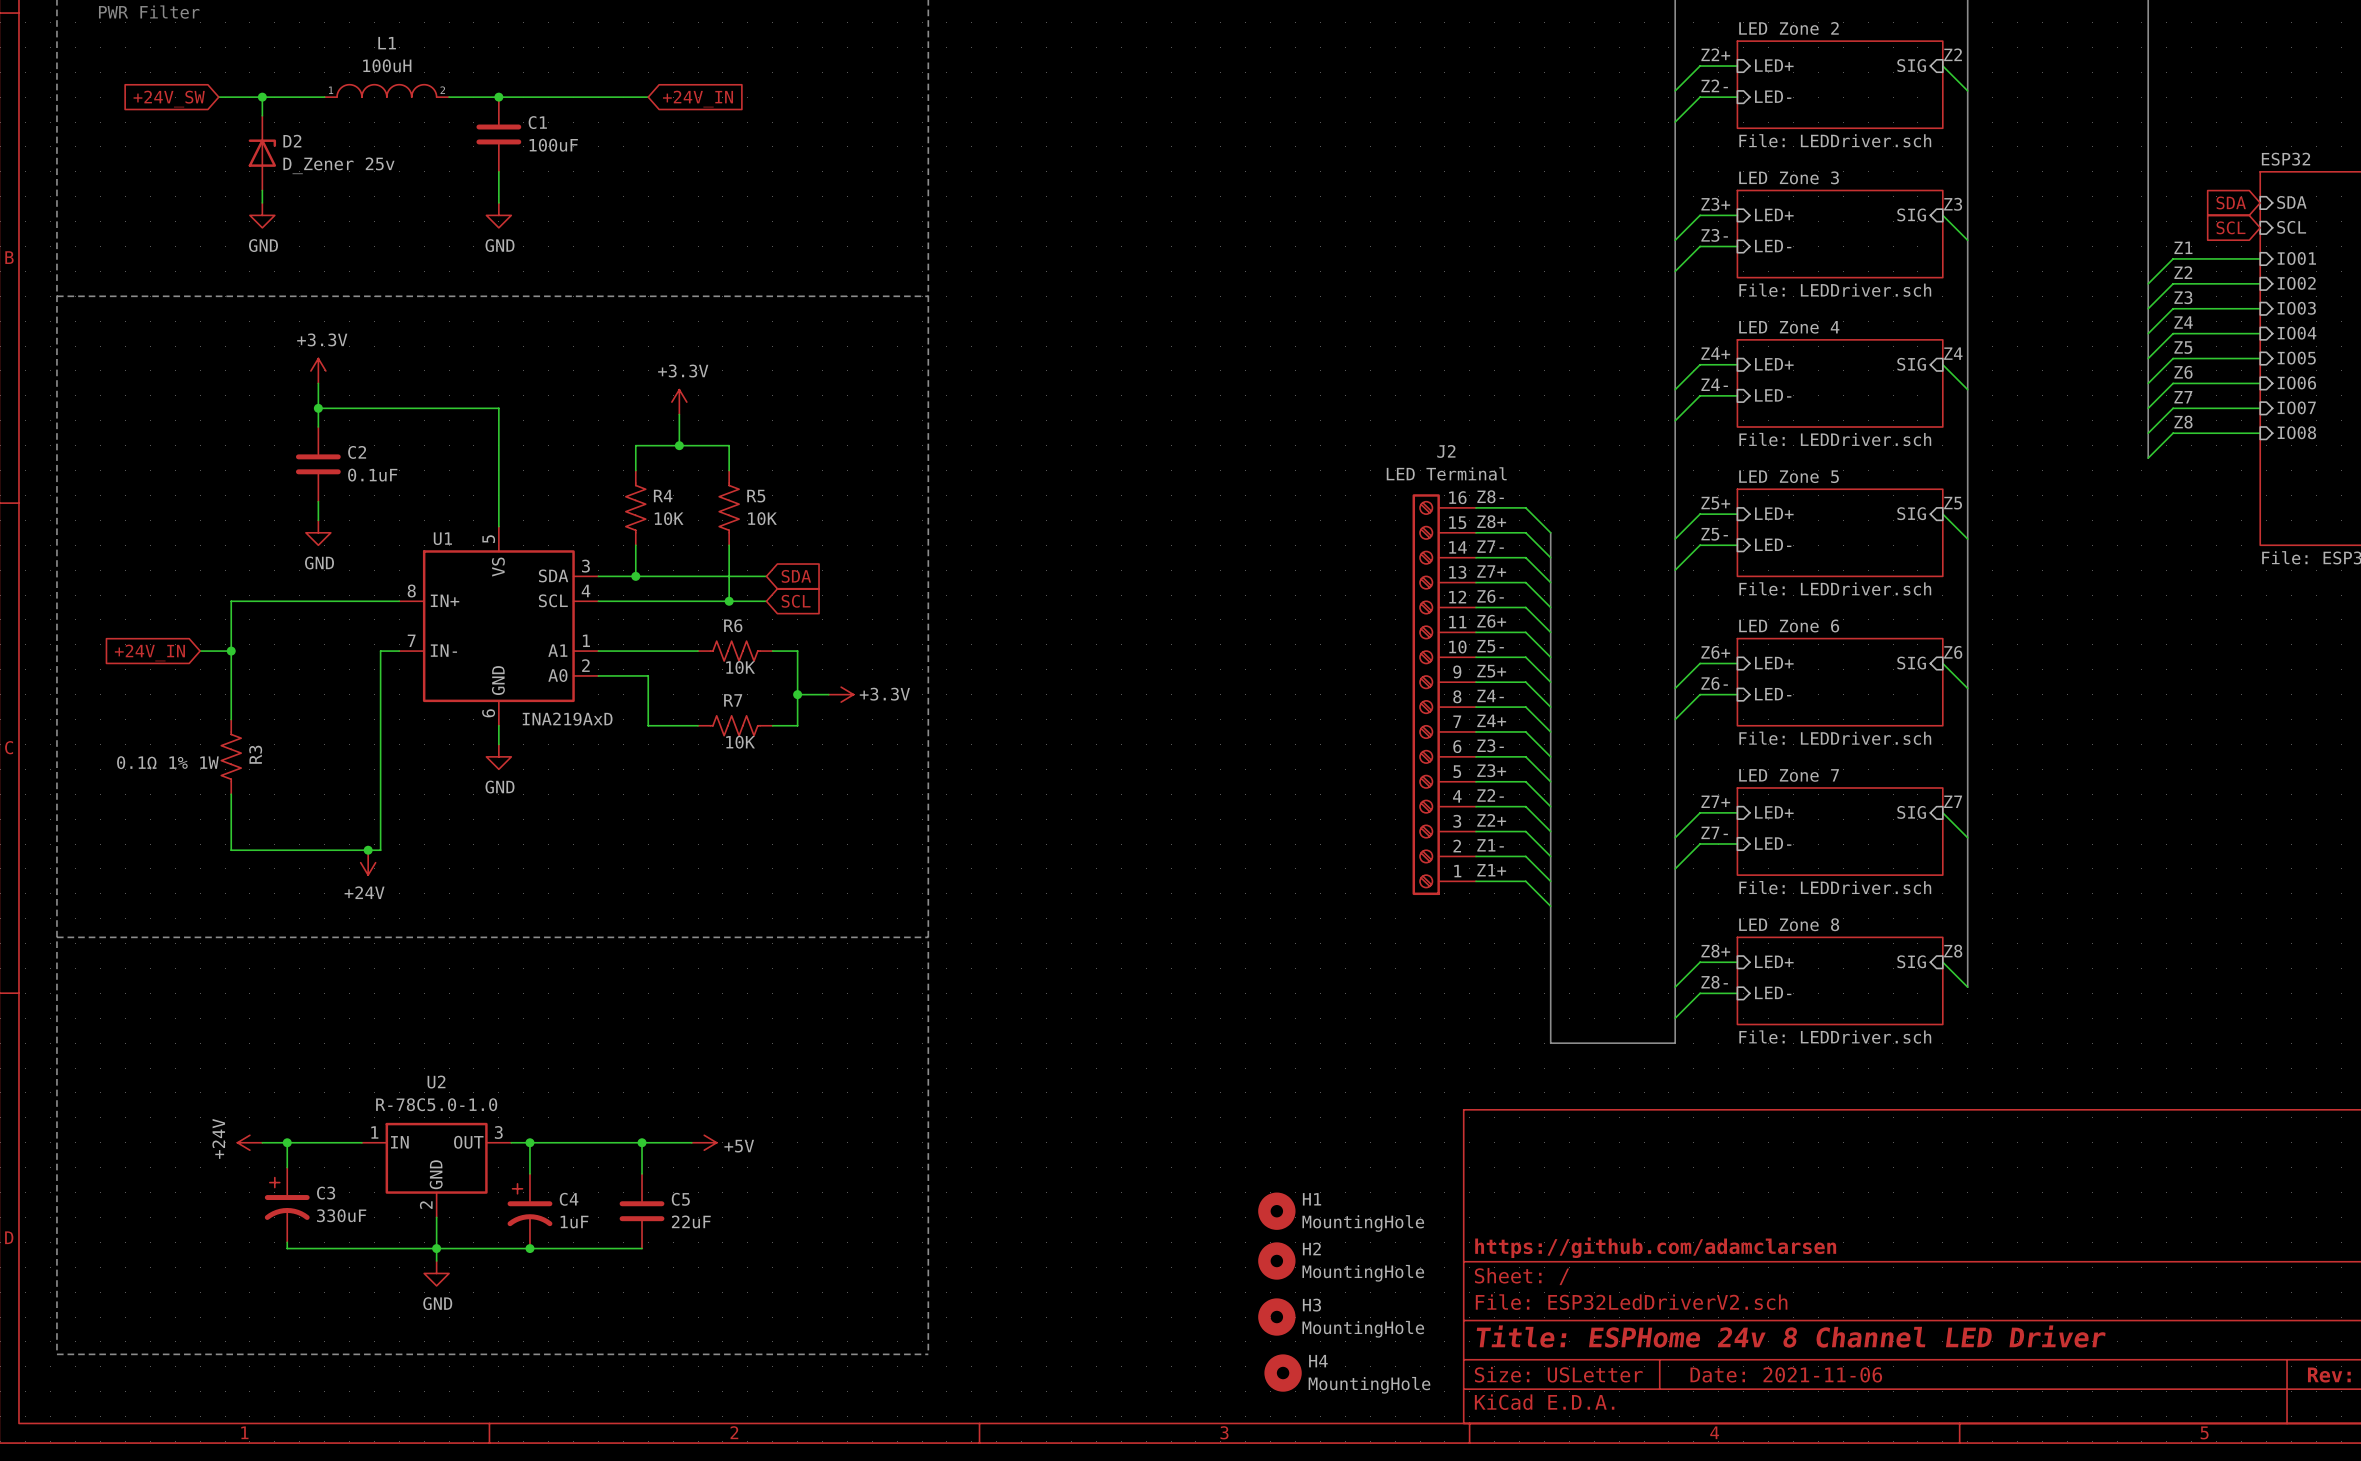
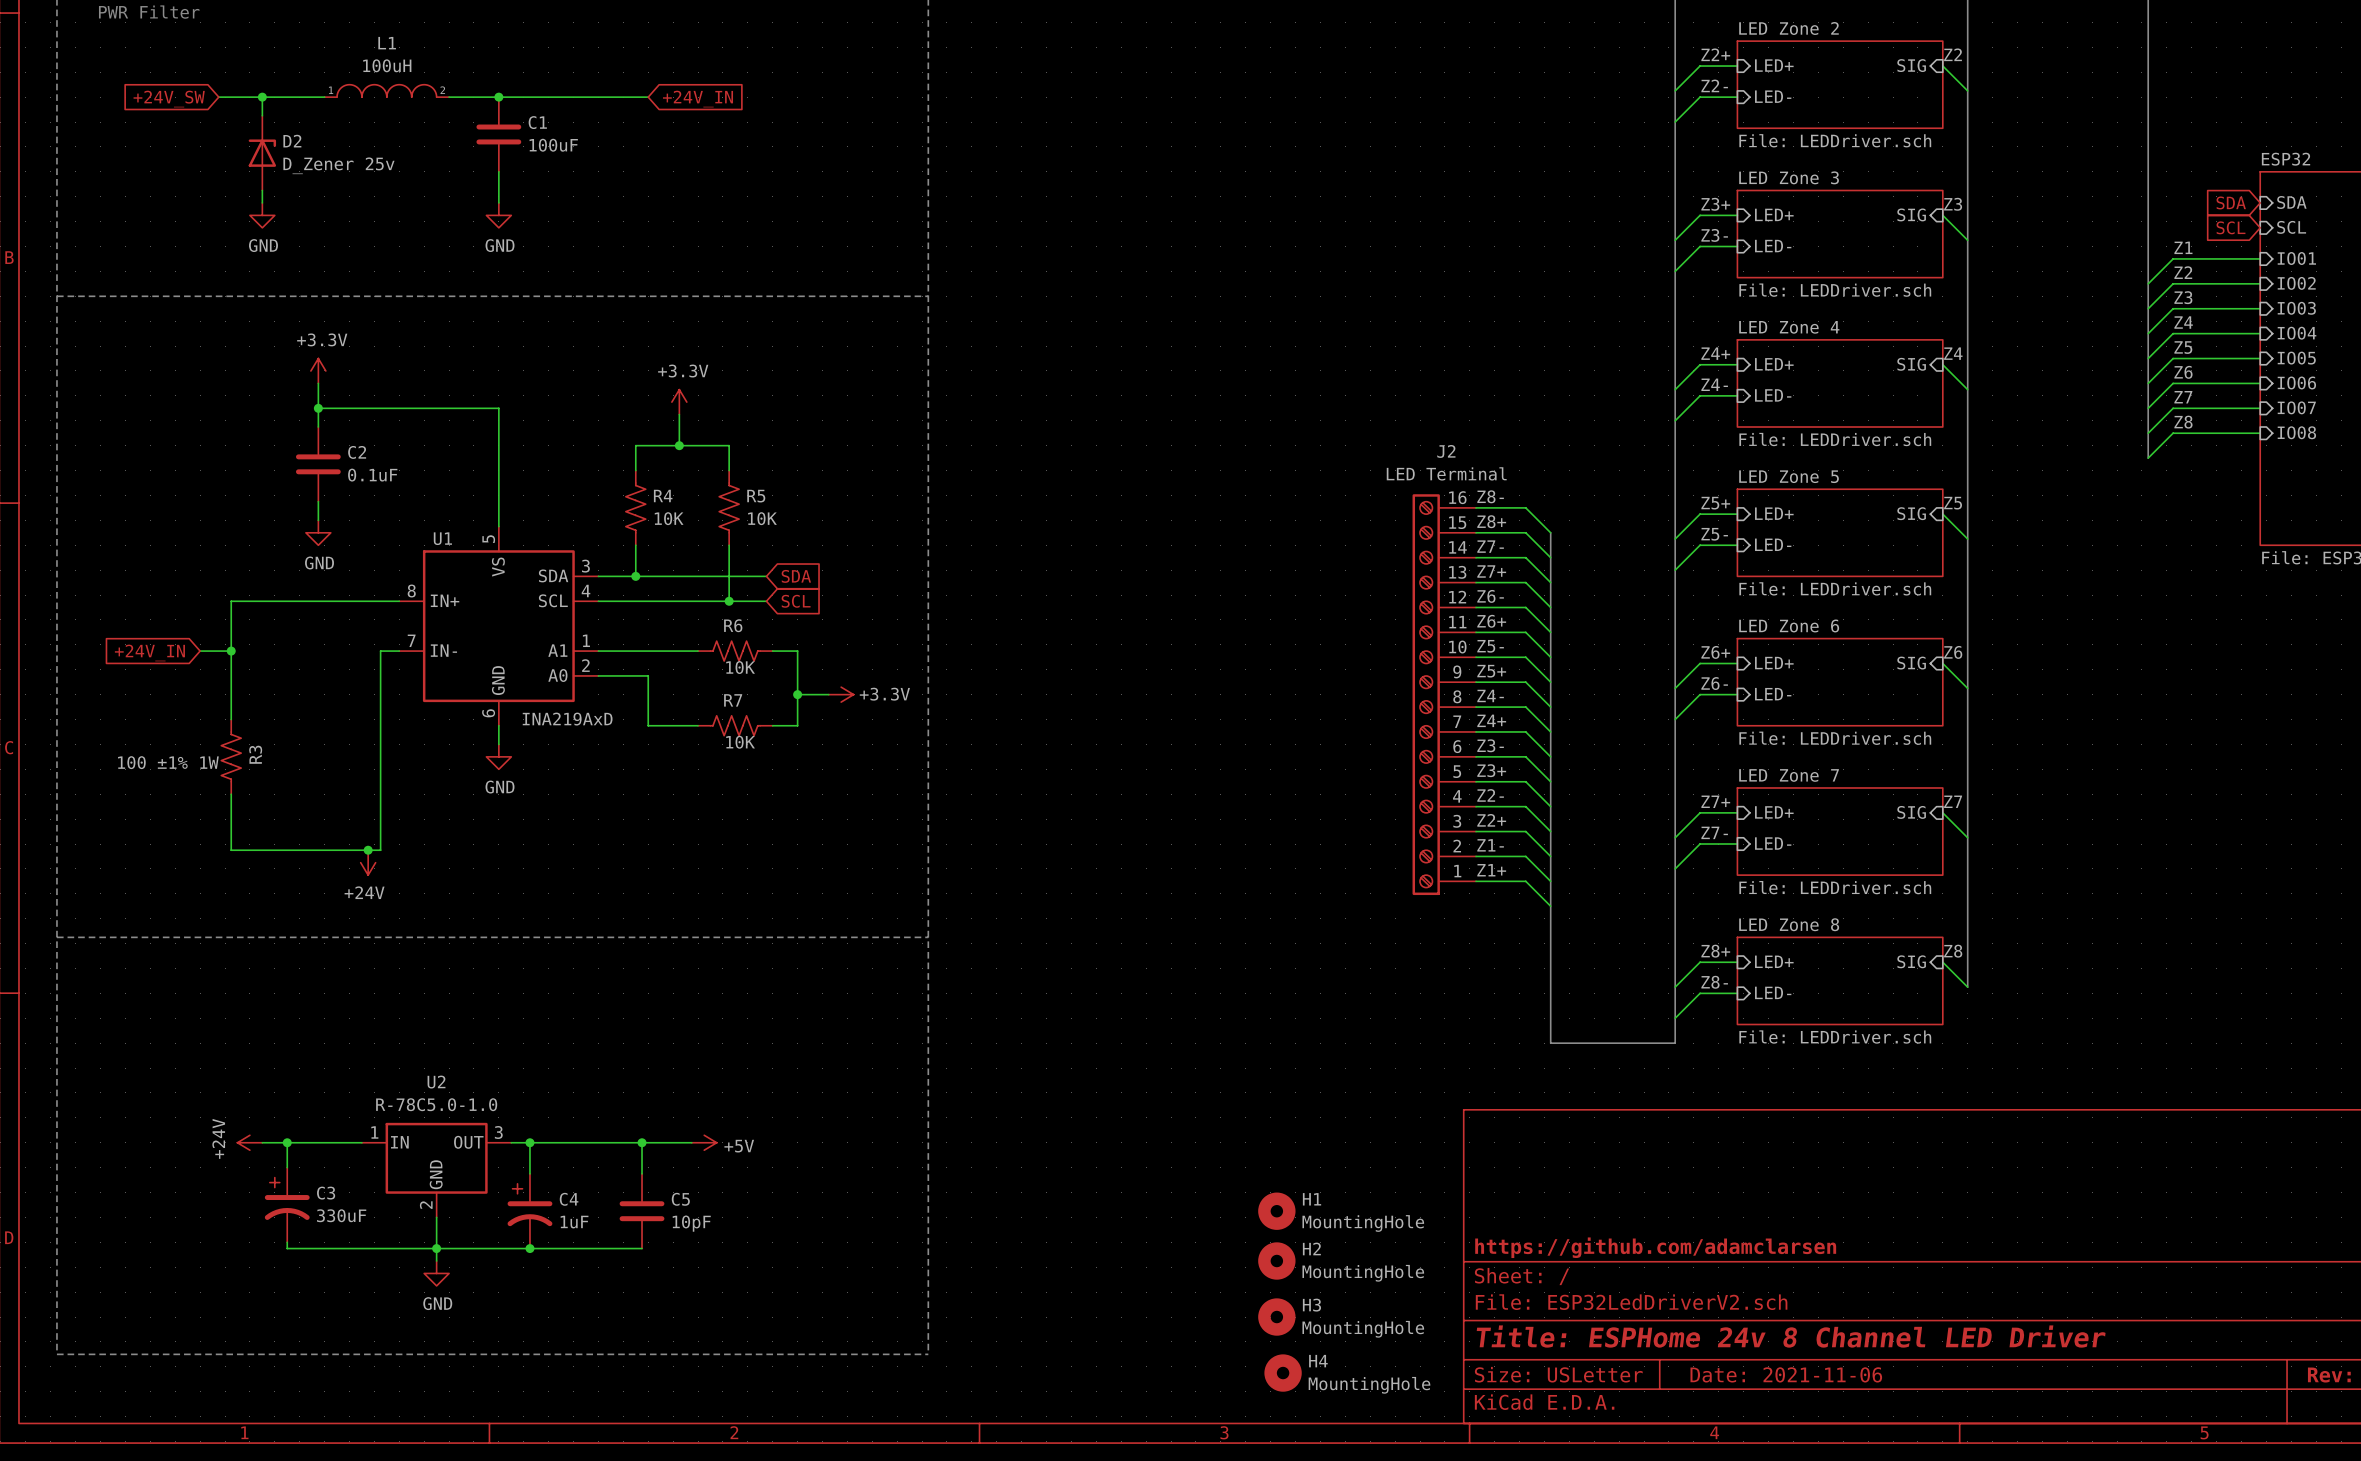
R3 value: 0.1Ω 1% 1W (167, 762) -> 100 ±1% 1W (168, 762)
C5 value: 22uF (691, 1221) -> 10pF (691, 1223)

